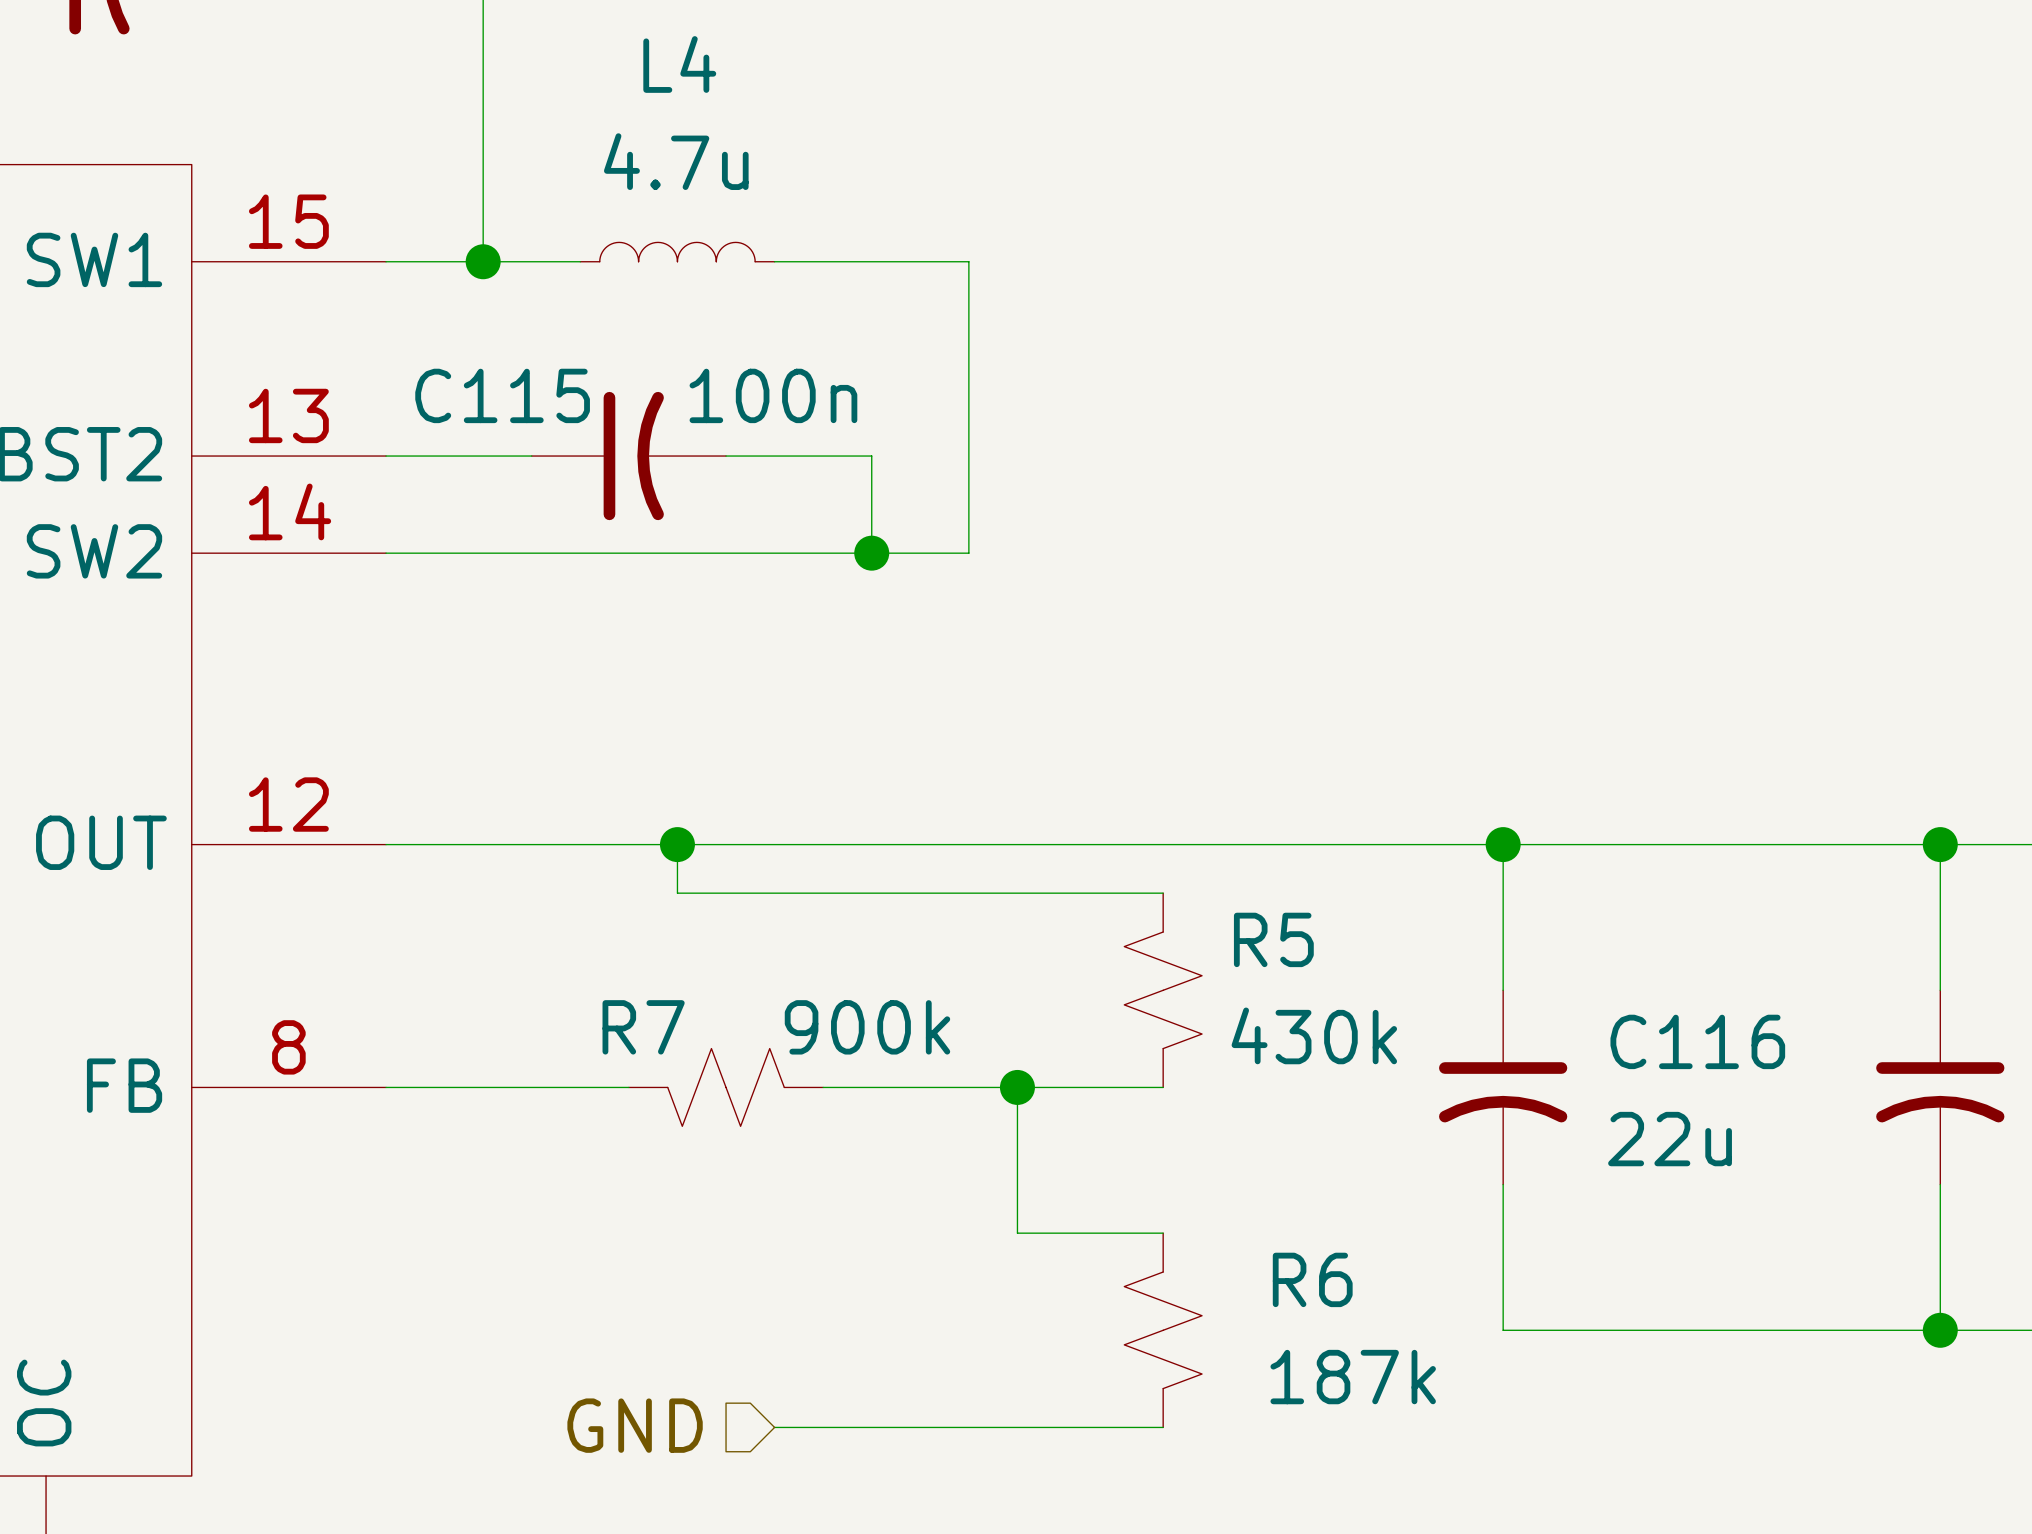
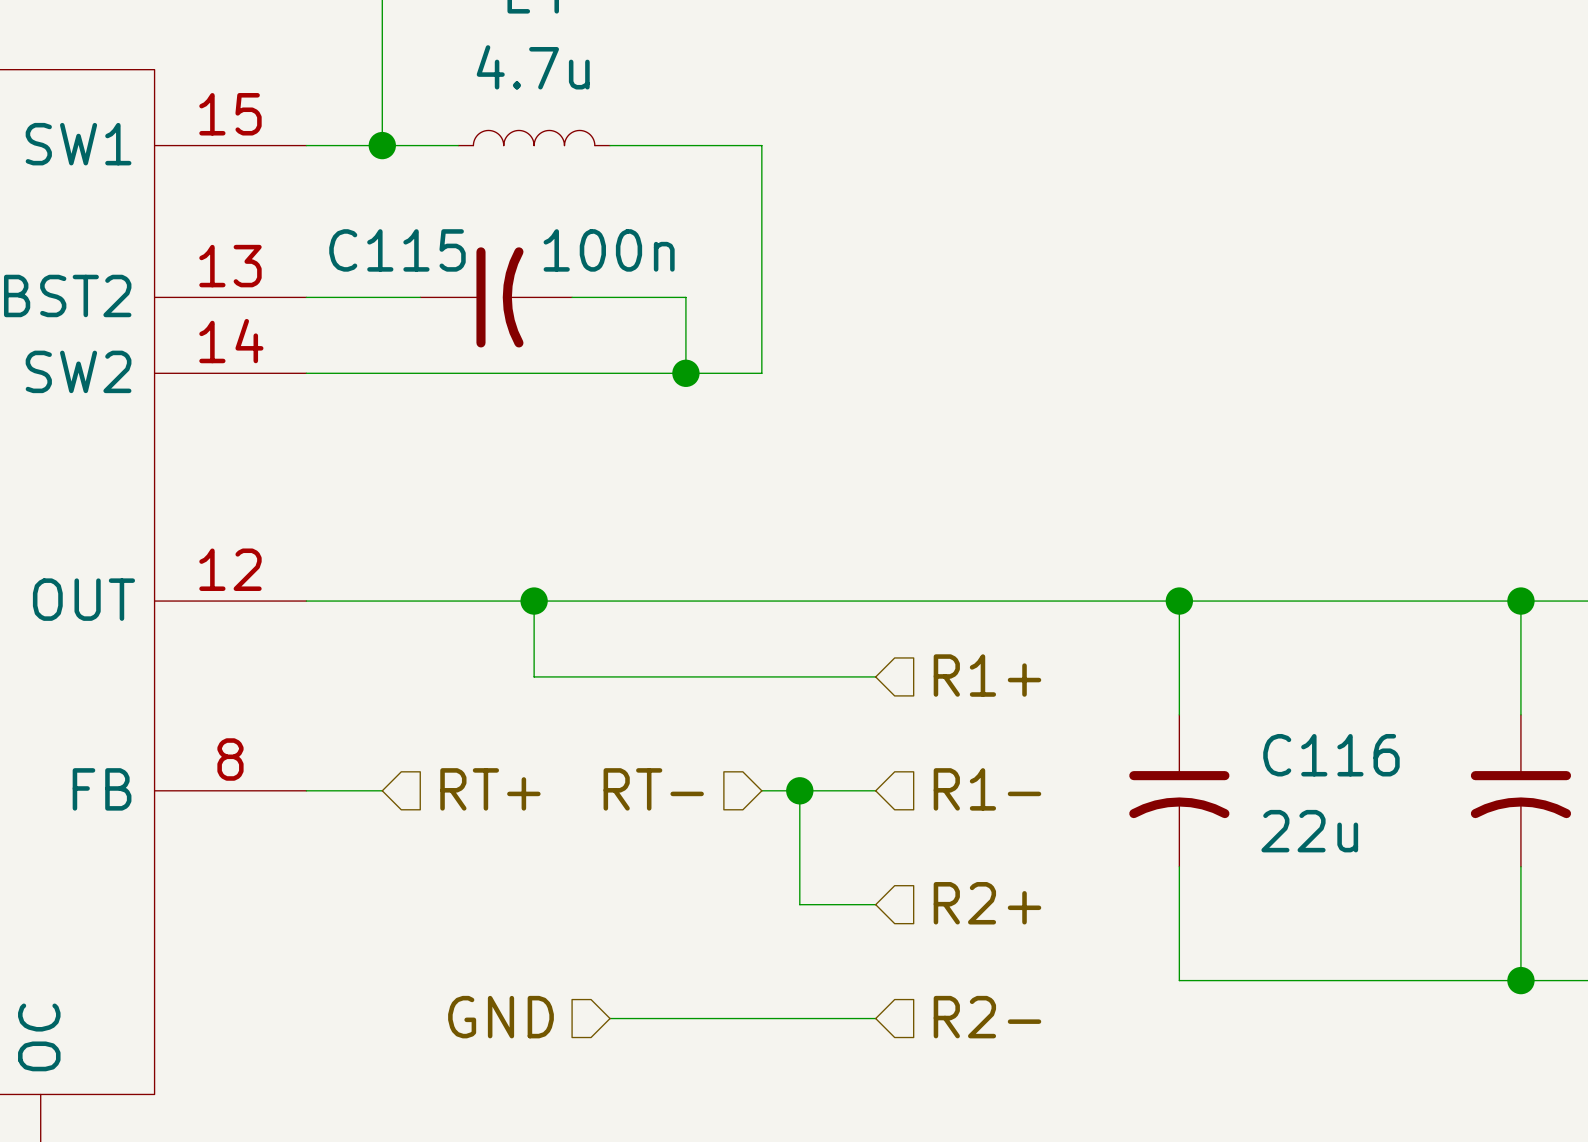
wire: (677, 893) (1163, 893) -> (534, 638) (534, 676) (875, 676)
hierarchical label: none -> R1+ (987, 675)
R5: 430k (1163, 990) -> none
hierarchical label: none -> RT+ (490, 789)
hierarchical label: none -> RT- (653, 789)
hierarchical label: none -> R1- (987, 789)
wire: (483, 1087) (628, 1087) -> none
R7: 900k (726, 1087) -> none
wire: (823, 1087) (968, 1087) -> none
wire: (1114, 1087) (1163, 1087) -> none
hierarchical label: none -> R2+ (987, 903)
wire: (1114, 1233) (1163, 1233) -> none
R6: 187k (1163, 1330) -> none
hierarchical label: none -> R2- (987, 1017)
wire: none -> (610, 1018) (875, 1018)
hierarchical label position: GND (635, 1425) -> GND (500, 1017)
wire: (774, 1427) (1163, 1427) -> none

